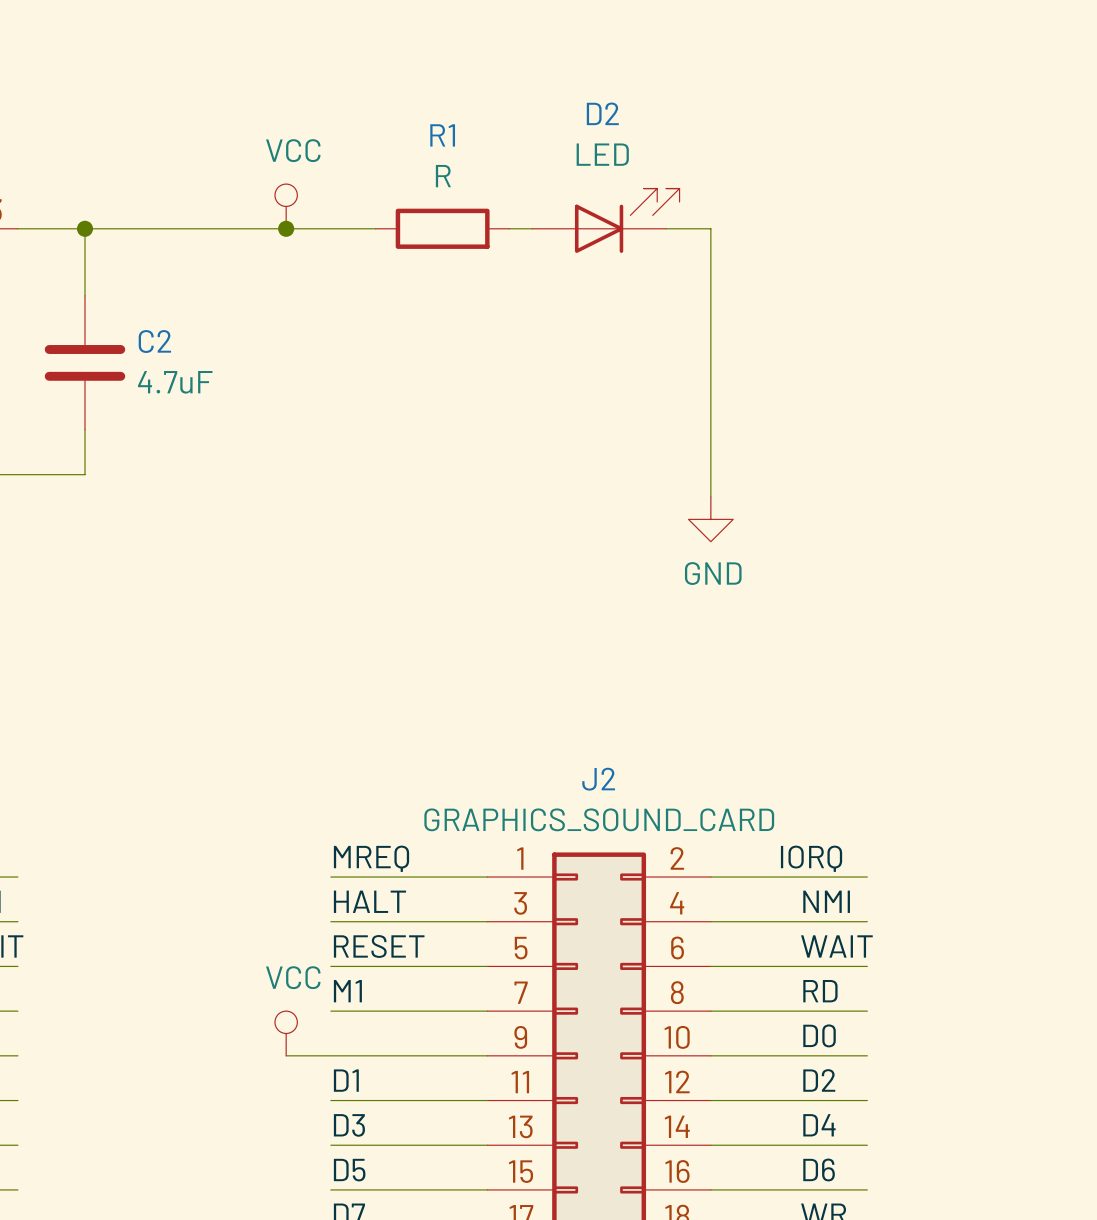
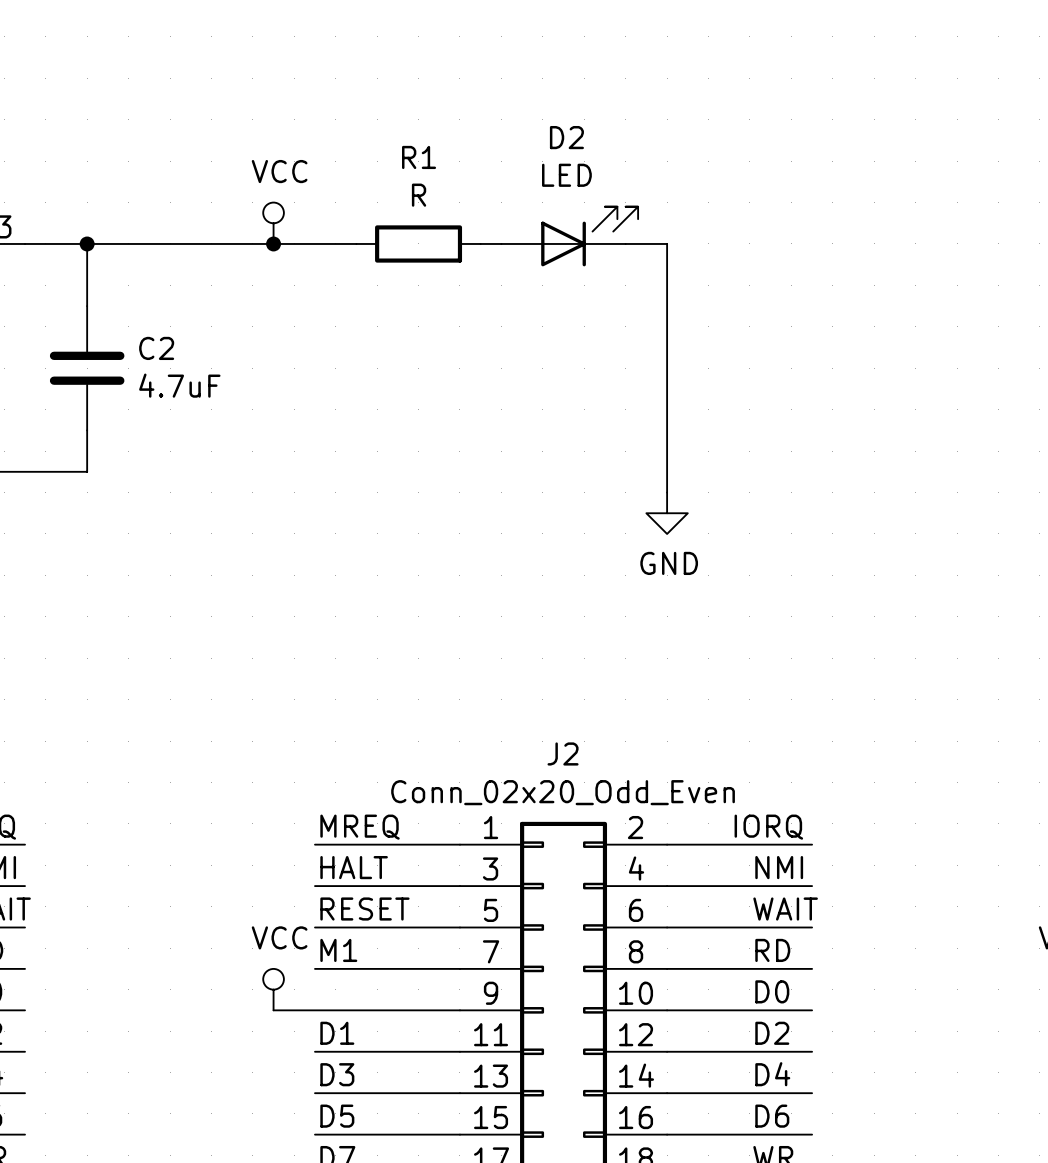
J2 value: GRAPHICS_SOUND_CARD (599, 819) -> Conn_02x20_Odd_Even (563, 792)

